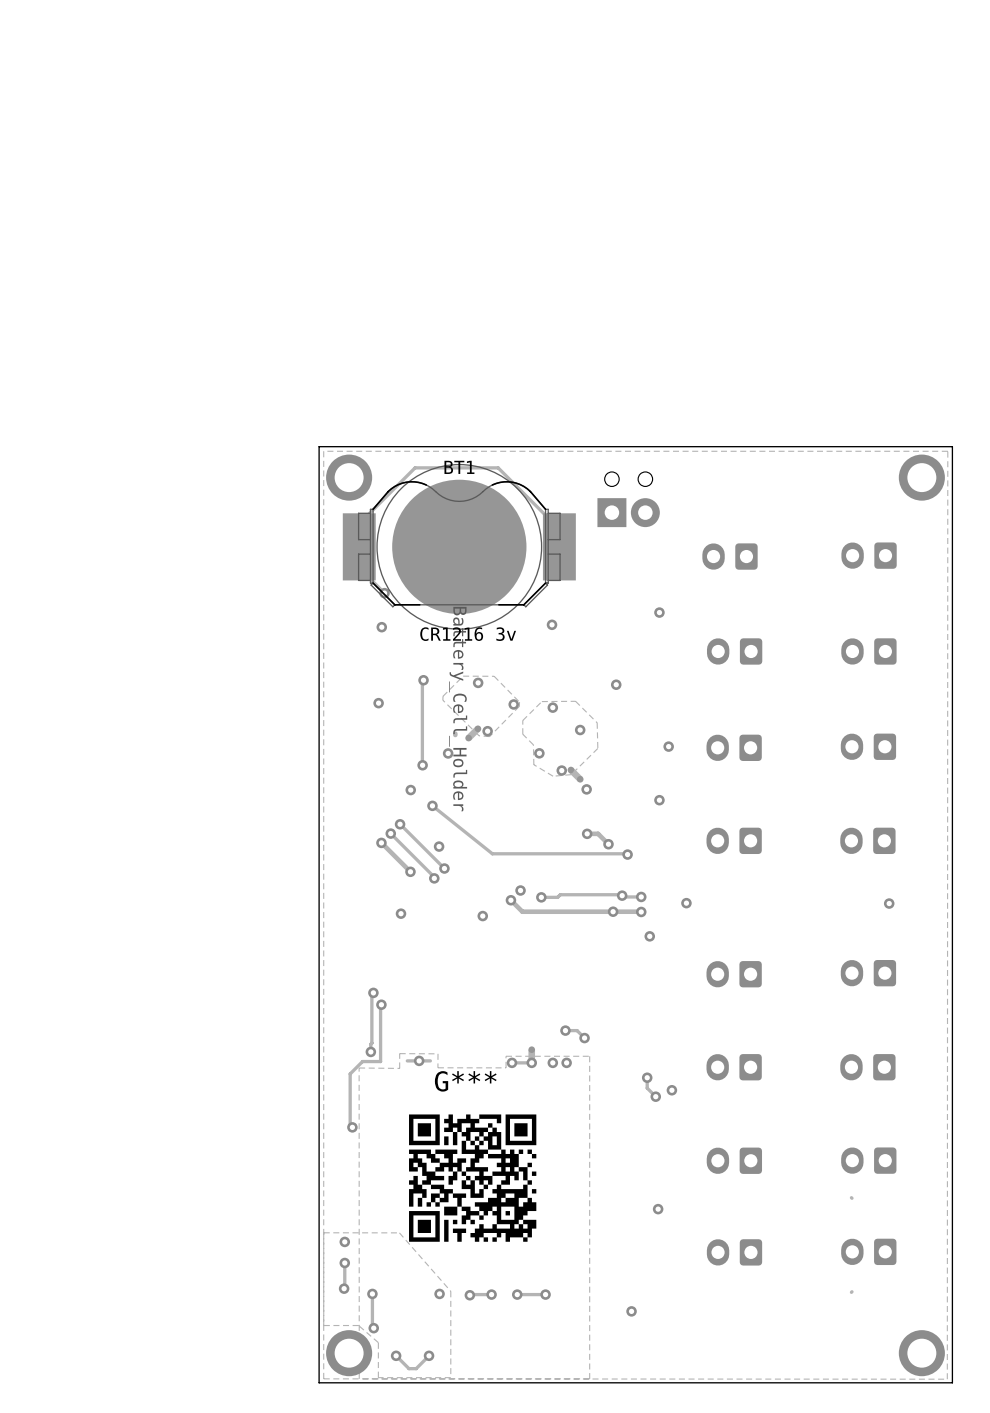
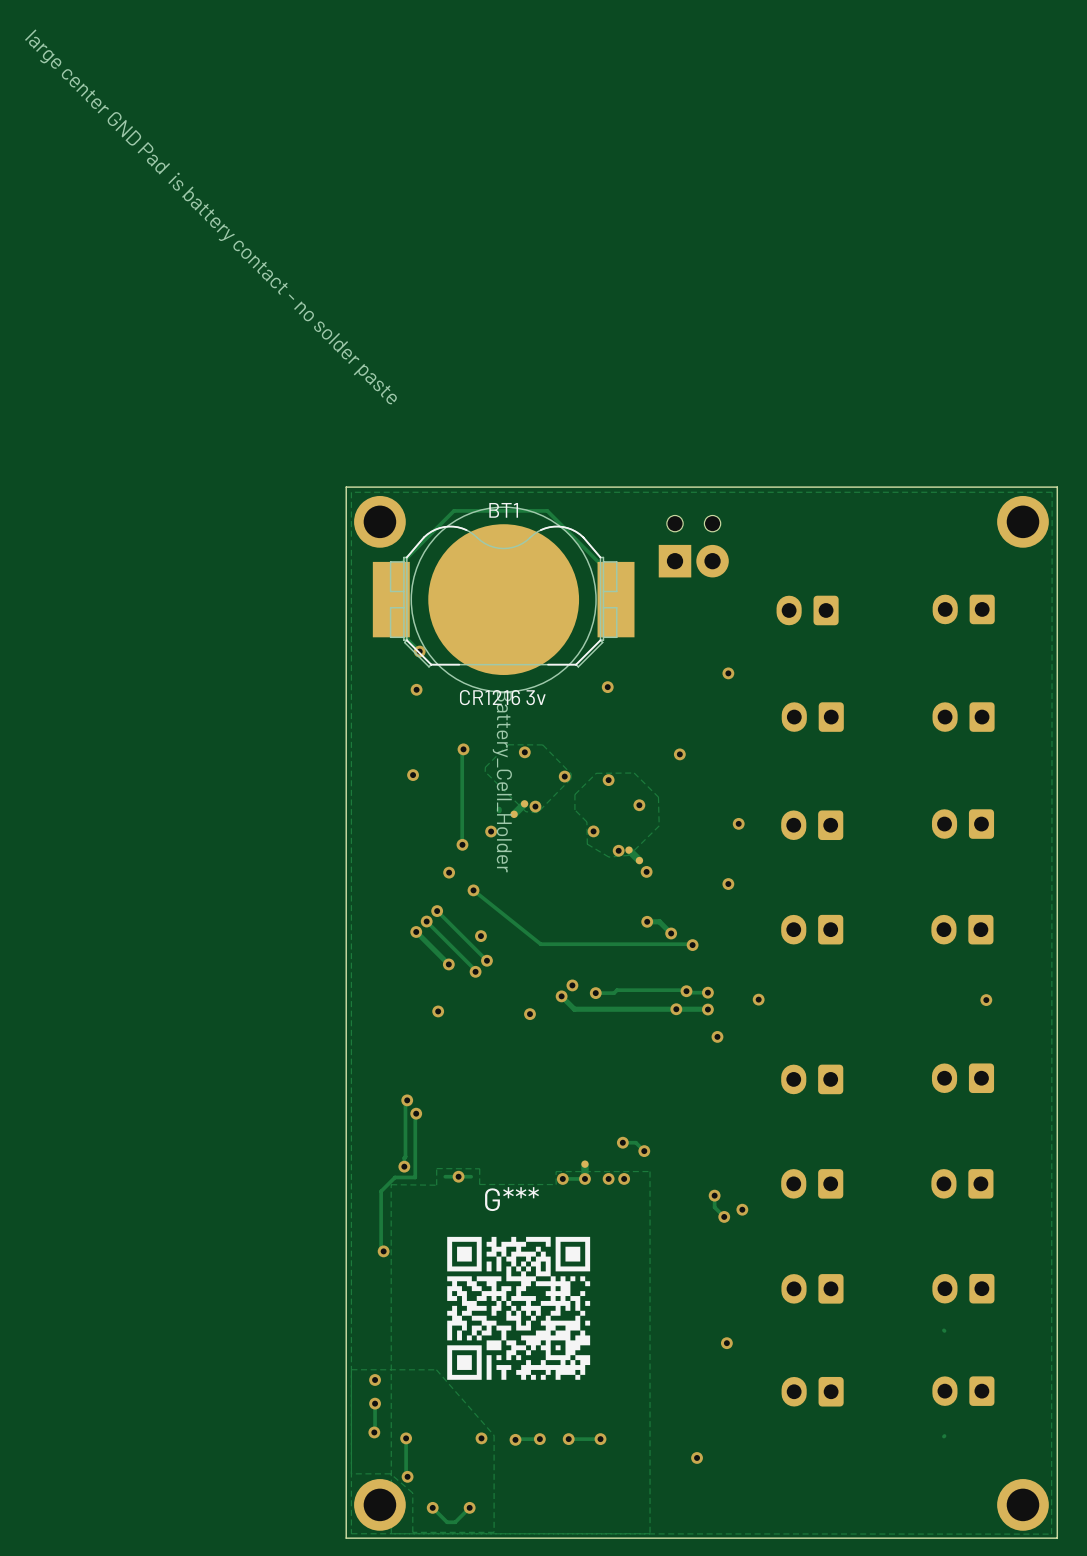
BT1 text: none -> large center GND Pad is battery contact - no solder paste (210, 216)

